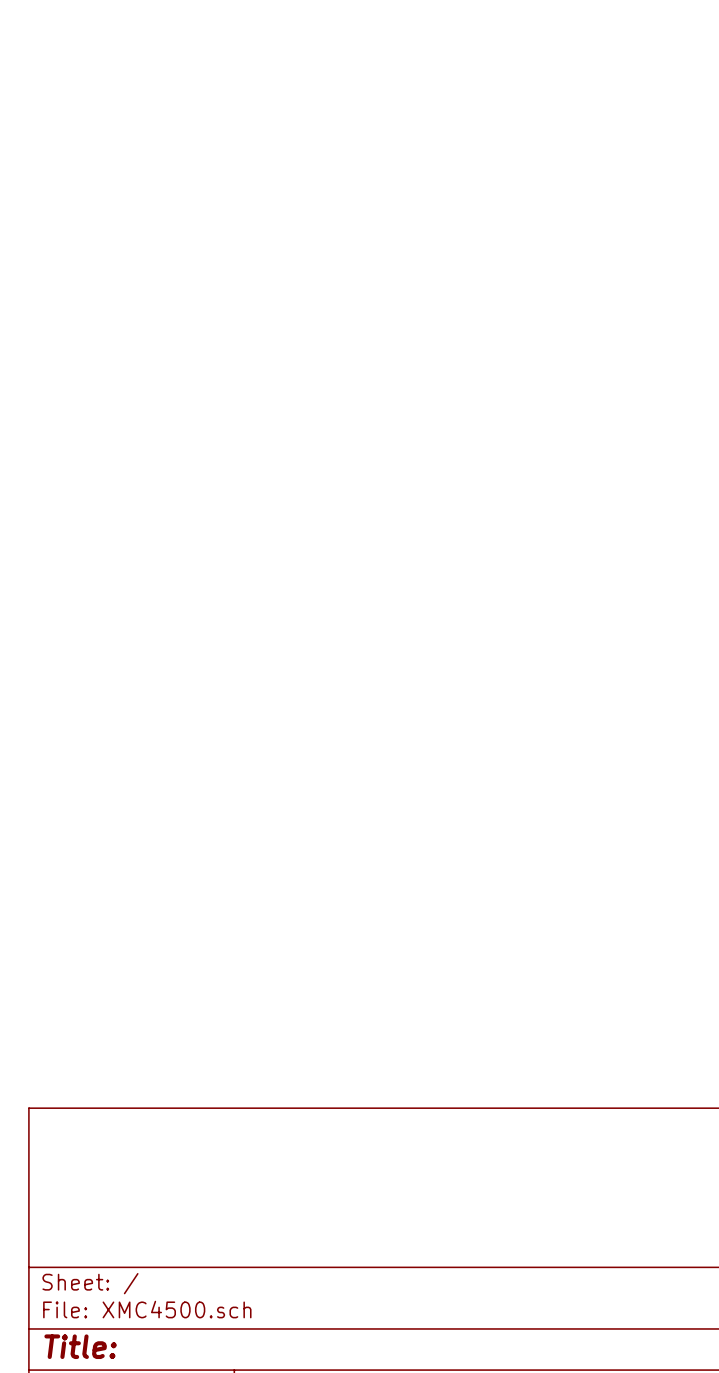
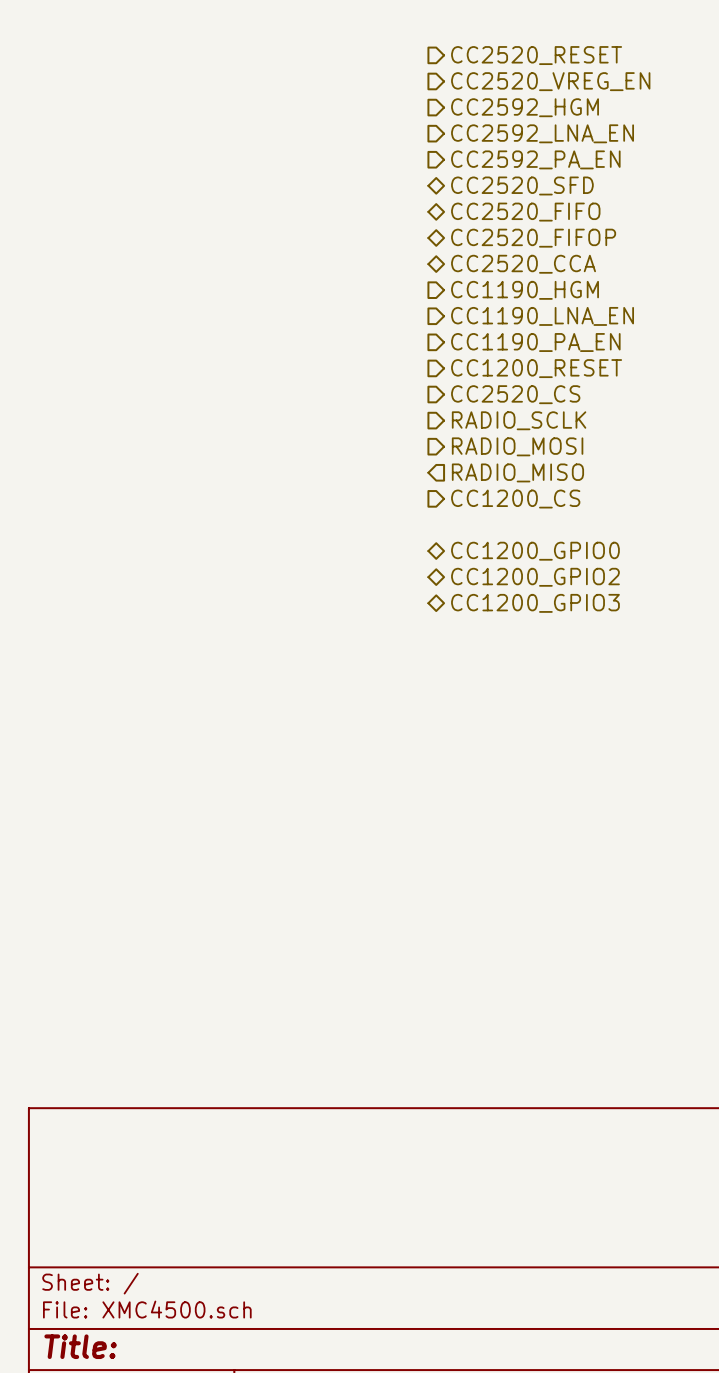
hierarchical label: none -> CC2520_RESET (536, 55)
hierarchical label: none -> CC2520_VREG_EN (550, 81)
hierarchical label: none -> CC2592_HGM (525, 107)
hierarchical label: none -> CC2592_LNA_EN (542, 133)
hierarchical label: none -> CC2592_PA_EN (535, 159)
hierarchical label: none -> CC2520_SFD (522, 185)
hierarchical label: none -> CC2520_FIFO (525, 212)
hierarchical label: none -> CC2520_FIFOP (533, 238)
hierarchical label: none -> CC2520_CCA (523, 264)
hierarchical label: none -> CC1190_HGM (525, 290)
hierarchical label: none -> CC1190_LNA_EN (542, 316)
hierarchical label: none -> CC1190_PA_EN (535, 342)
hierarchical label: none -> CC1200_RESET (536, 368)
hierarchical label: none -> CC2520_CS (515, 394)
hierarchical label: none -> RADIO_SCLK (519, 420)
hierarchical label: none -> RADIO_MOSI (517, 446)
hierarchical label: none -> RADIO_MISO (517, 472)
hierarchical label: none -> CC1200_CS (515, 499)
hierarchical label: none -> CC1200_GPIO0 (535, 551)
hierarchical label: none -> CC1200_GPIO2 (535, 577)
hierarchical label: none -> CC1200_GPIO3 (535, 603)

